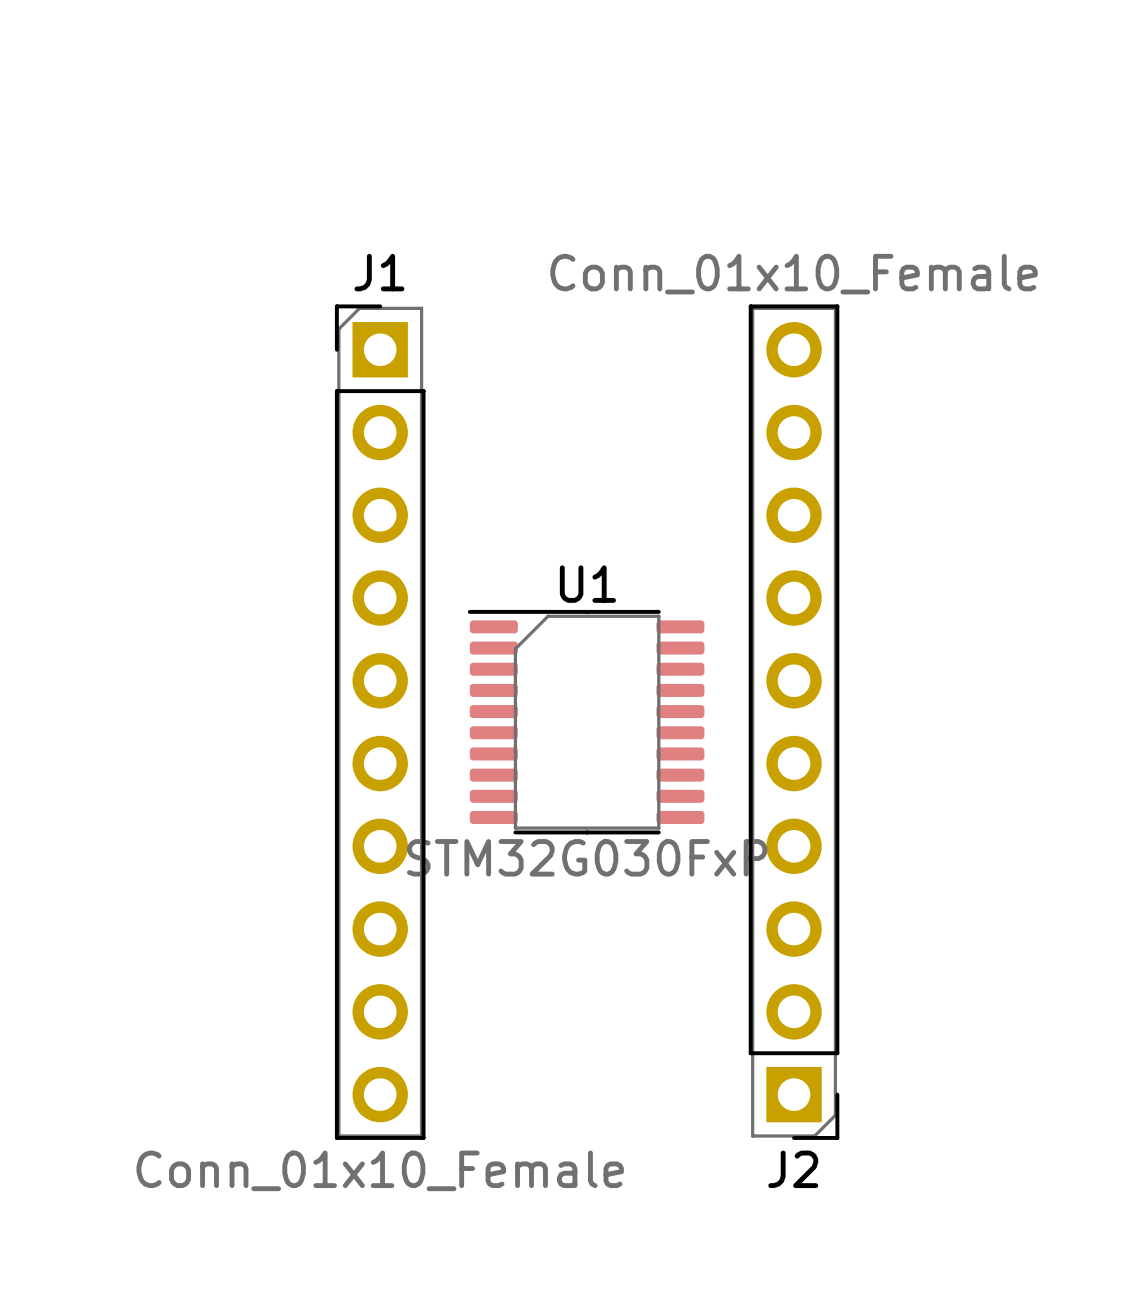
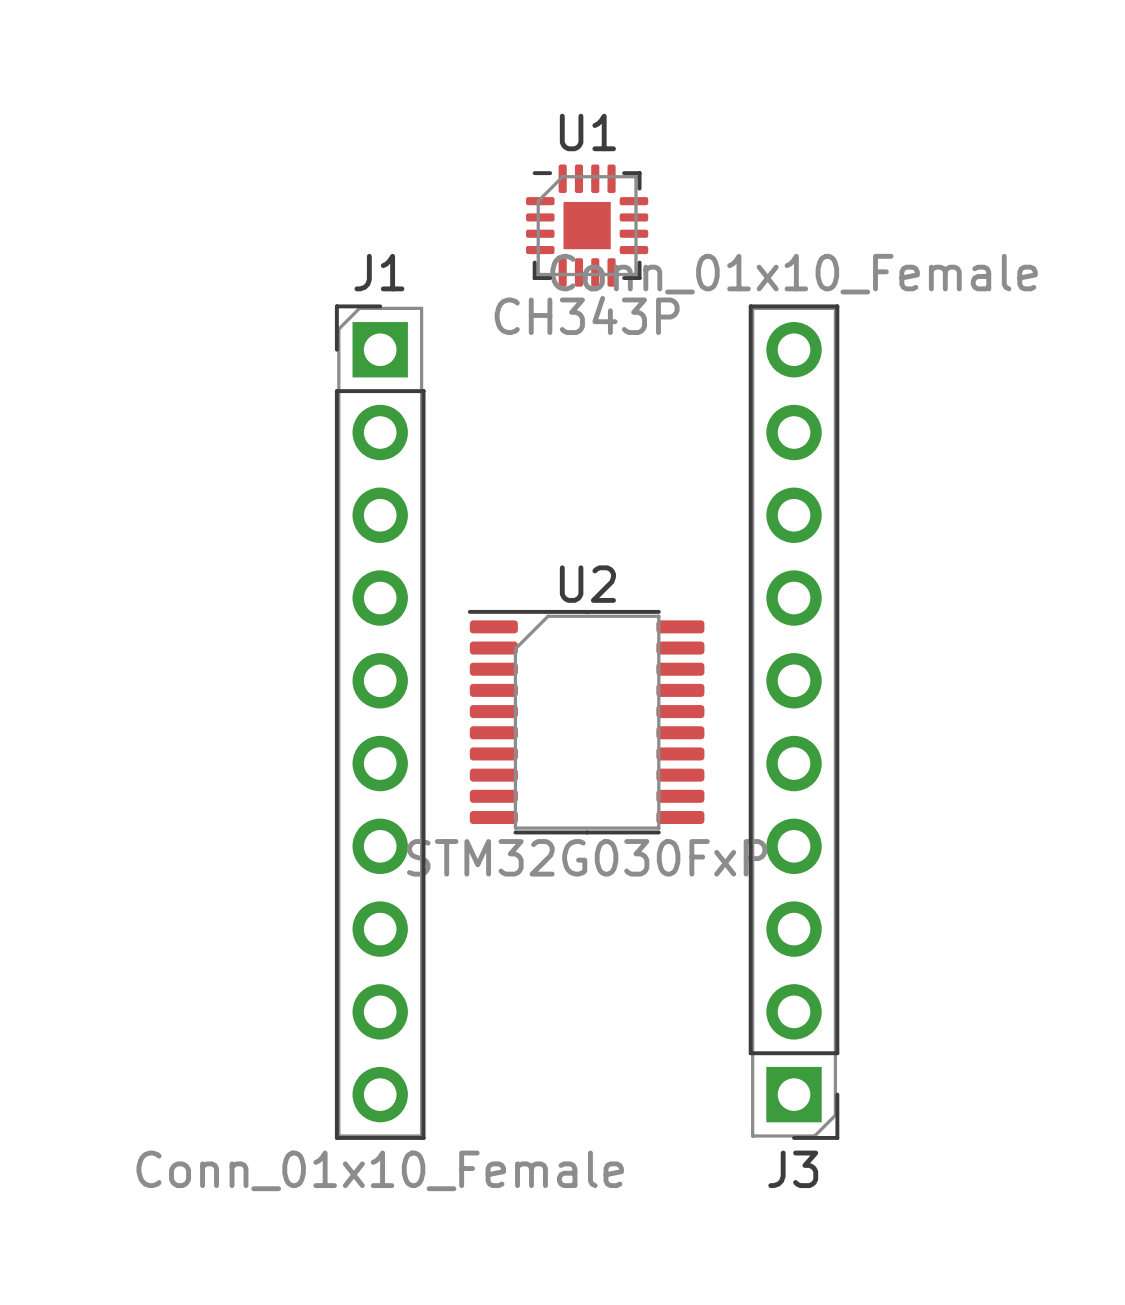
U1: none -> CH343P (587, 225)
U1 name: U1 (587, 584) -> U2 (587, 584)
J2 name: J2 (793, 1169) -> J3 (793, 1169)

